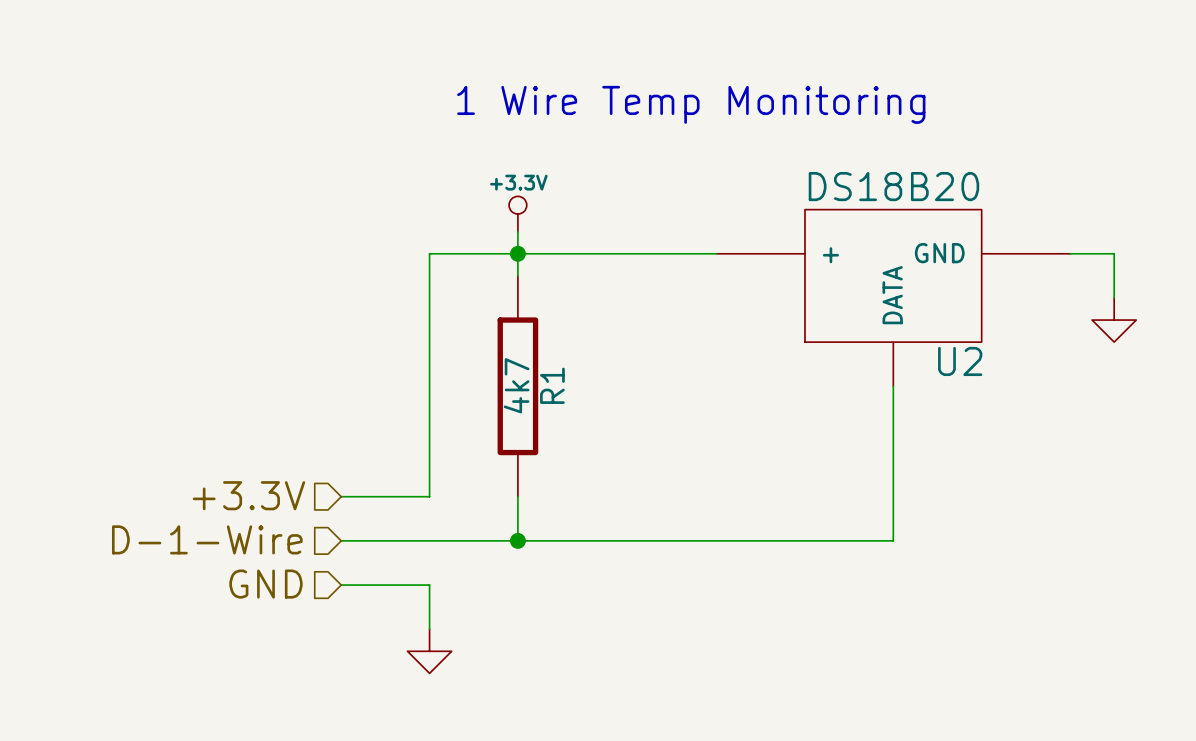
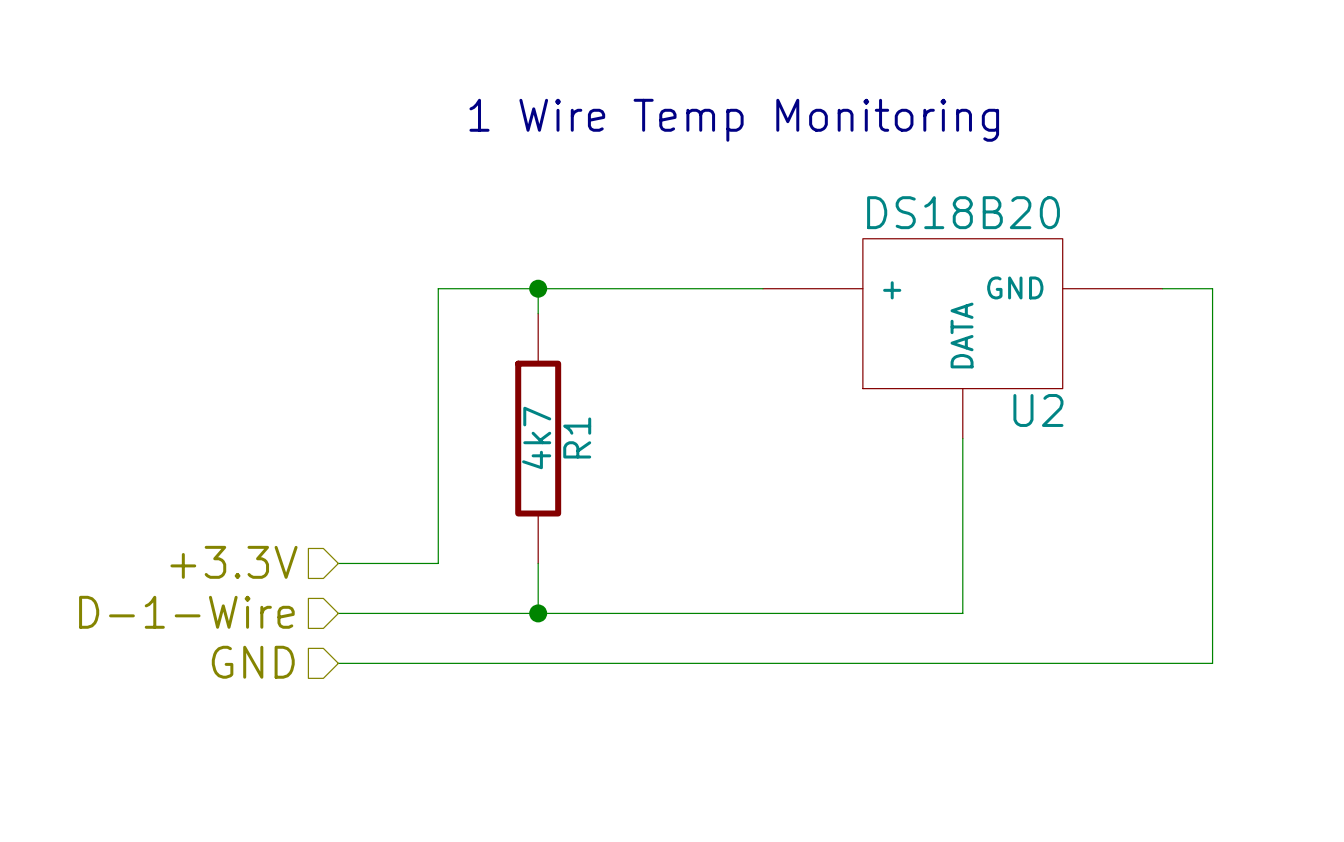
power symbol: +3.3V (517, 214) -> none
wire: (517, 231) (517, 253) -> none
power symbol: (1114, 320) -> none
wire: (429, 585) (429, 629) -> (438, 663) (1212, 663) (1212, 338)
power symbol: (429, 651) -> none

